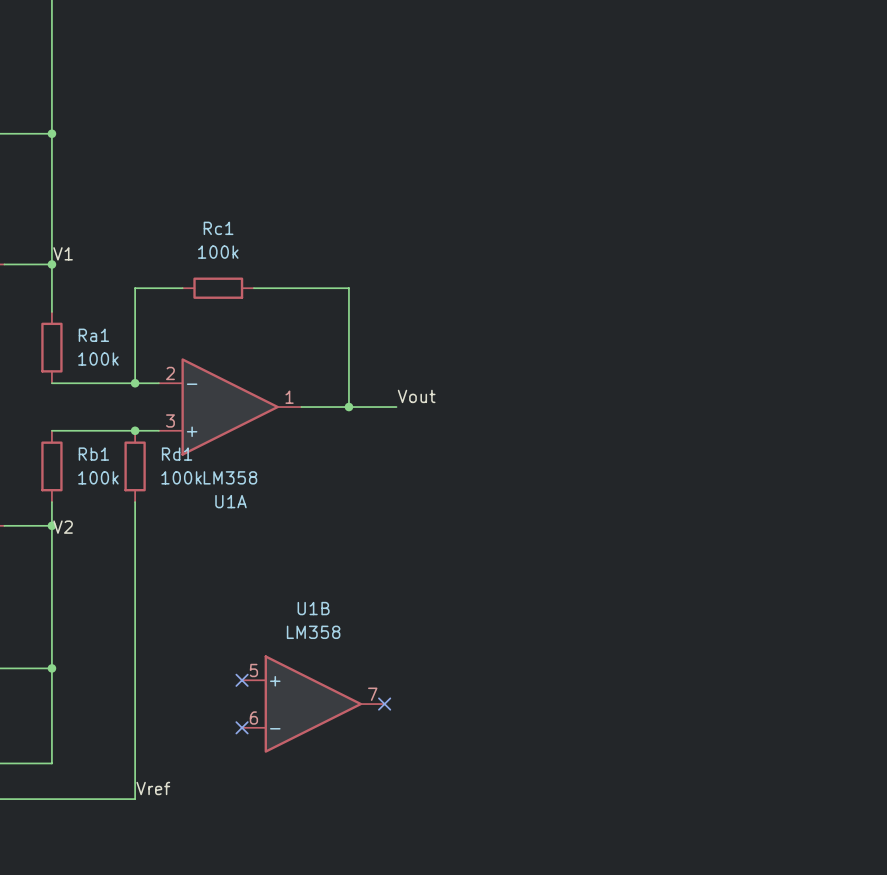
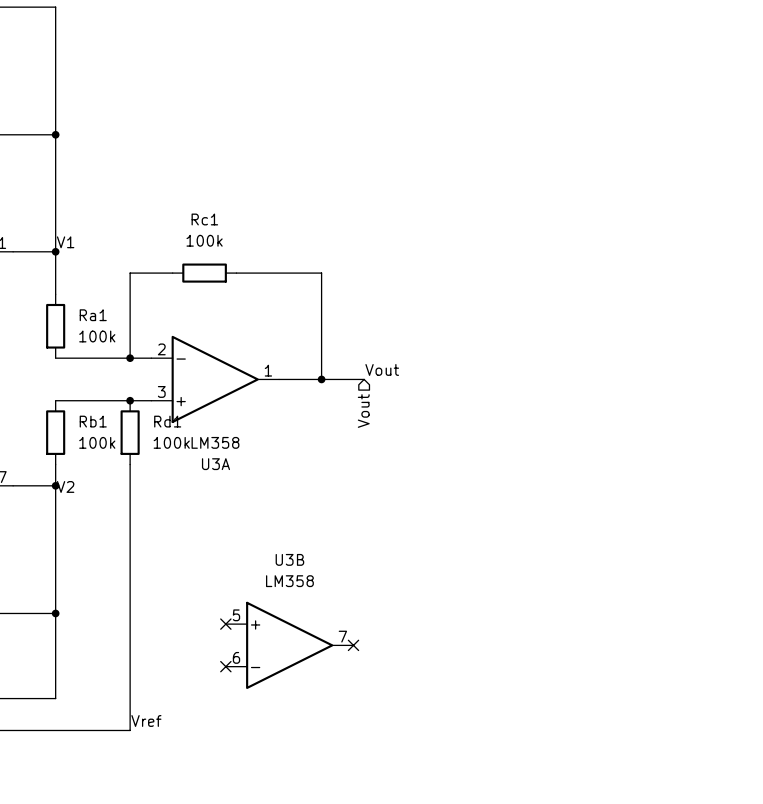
hierarchical label: none -> Vout (363, 411)
U1A name: U1A (231, 501) -> U3A (215, 464)
U1B name: U1B (313, 608) -> U3B (289, 559)

